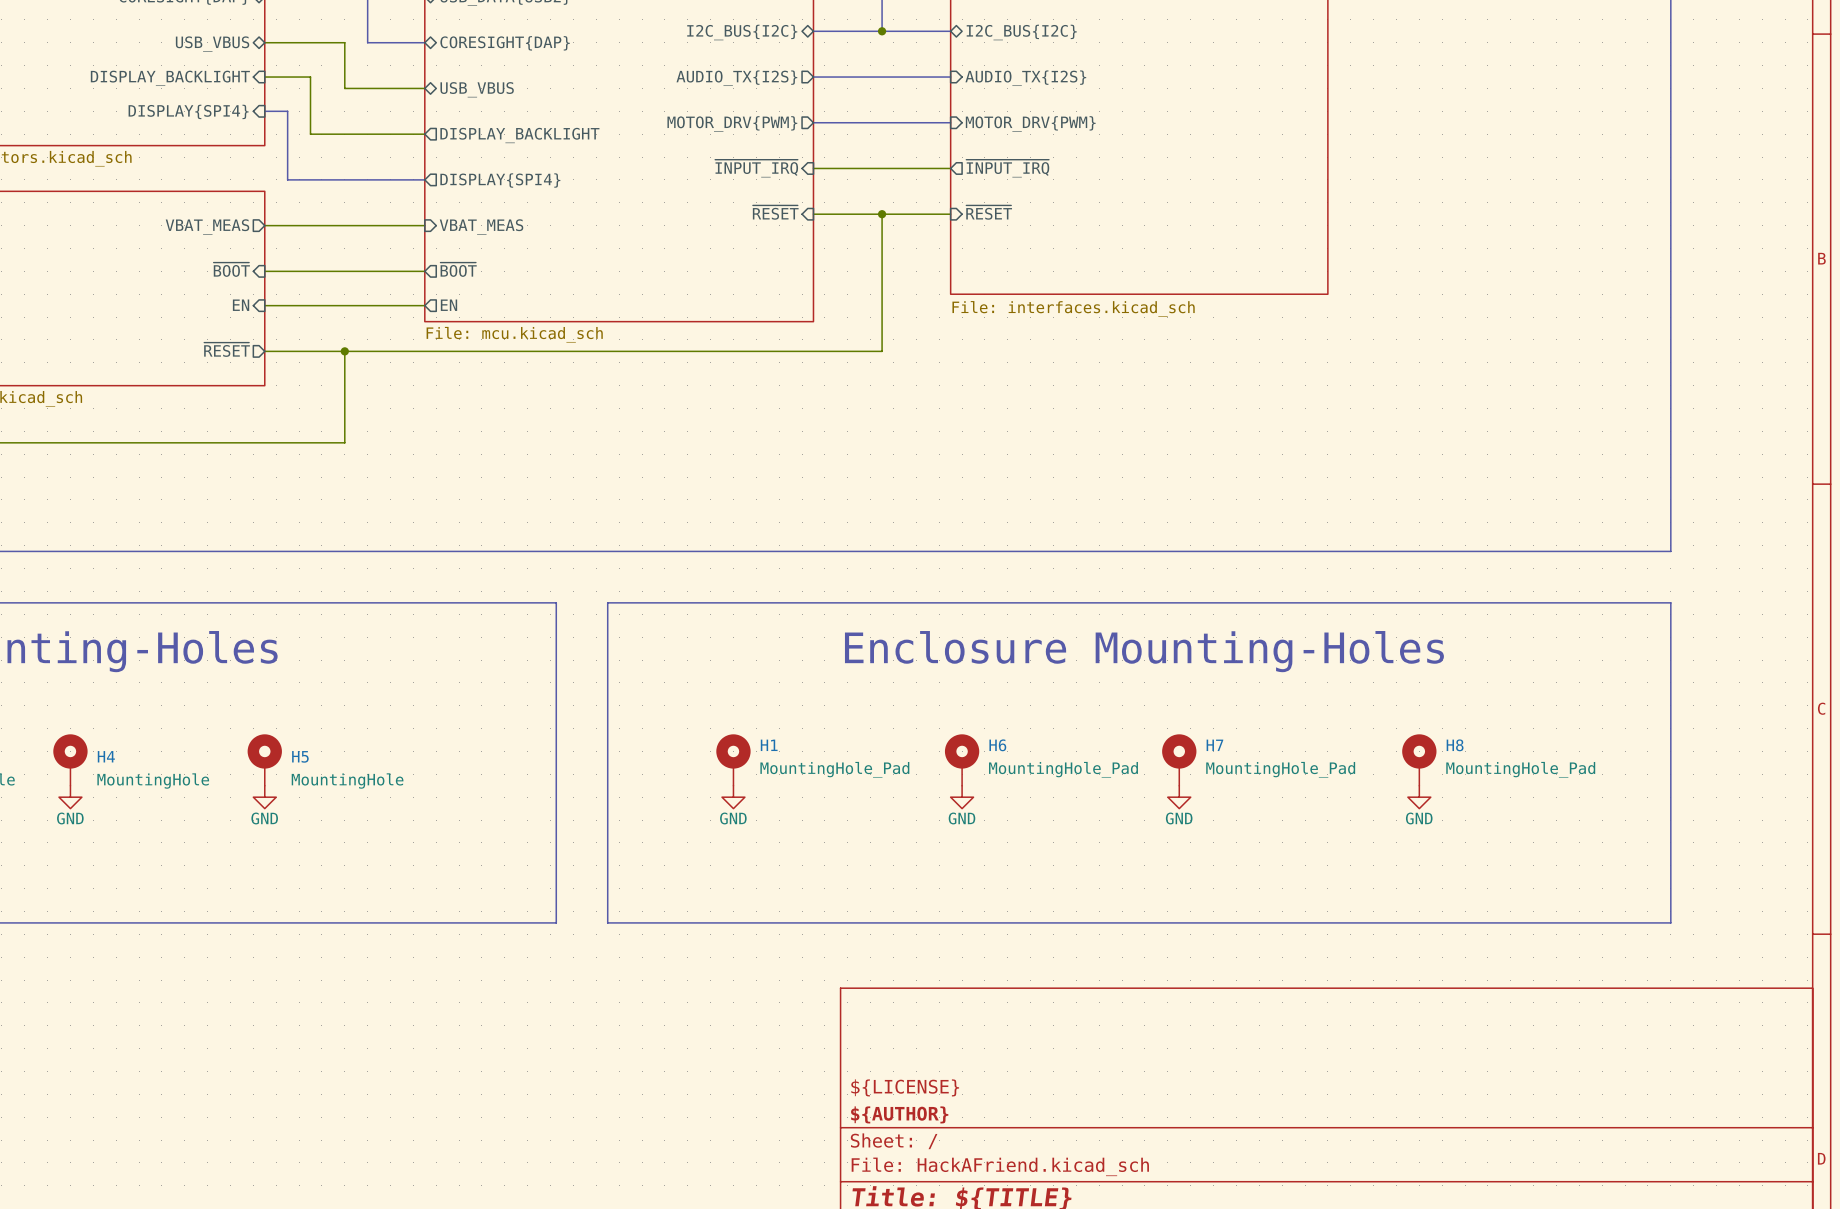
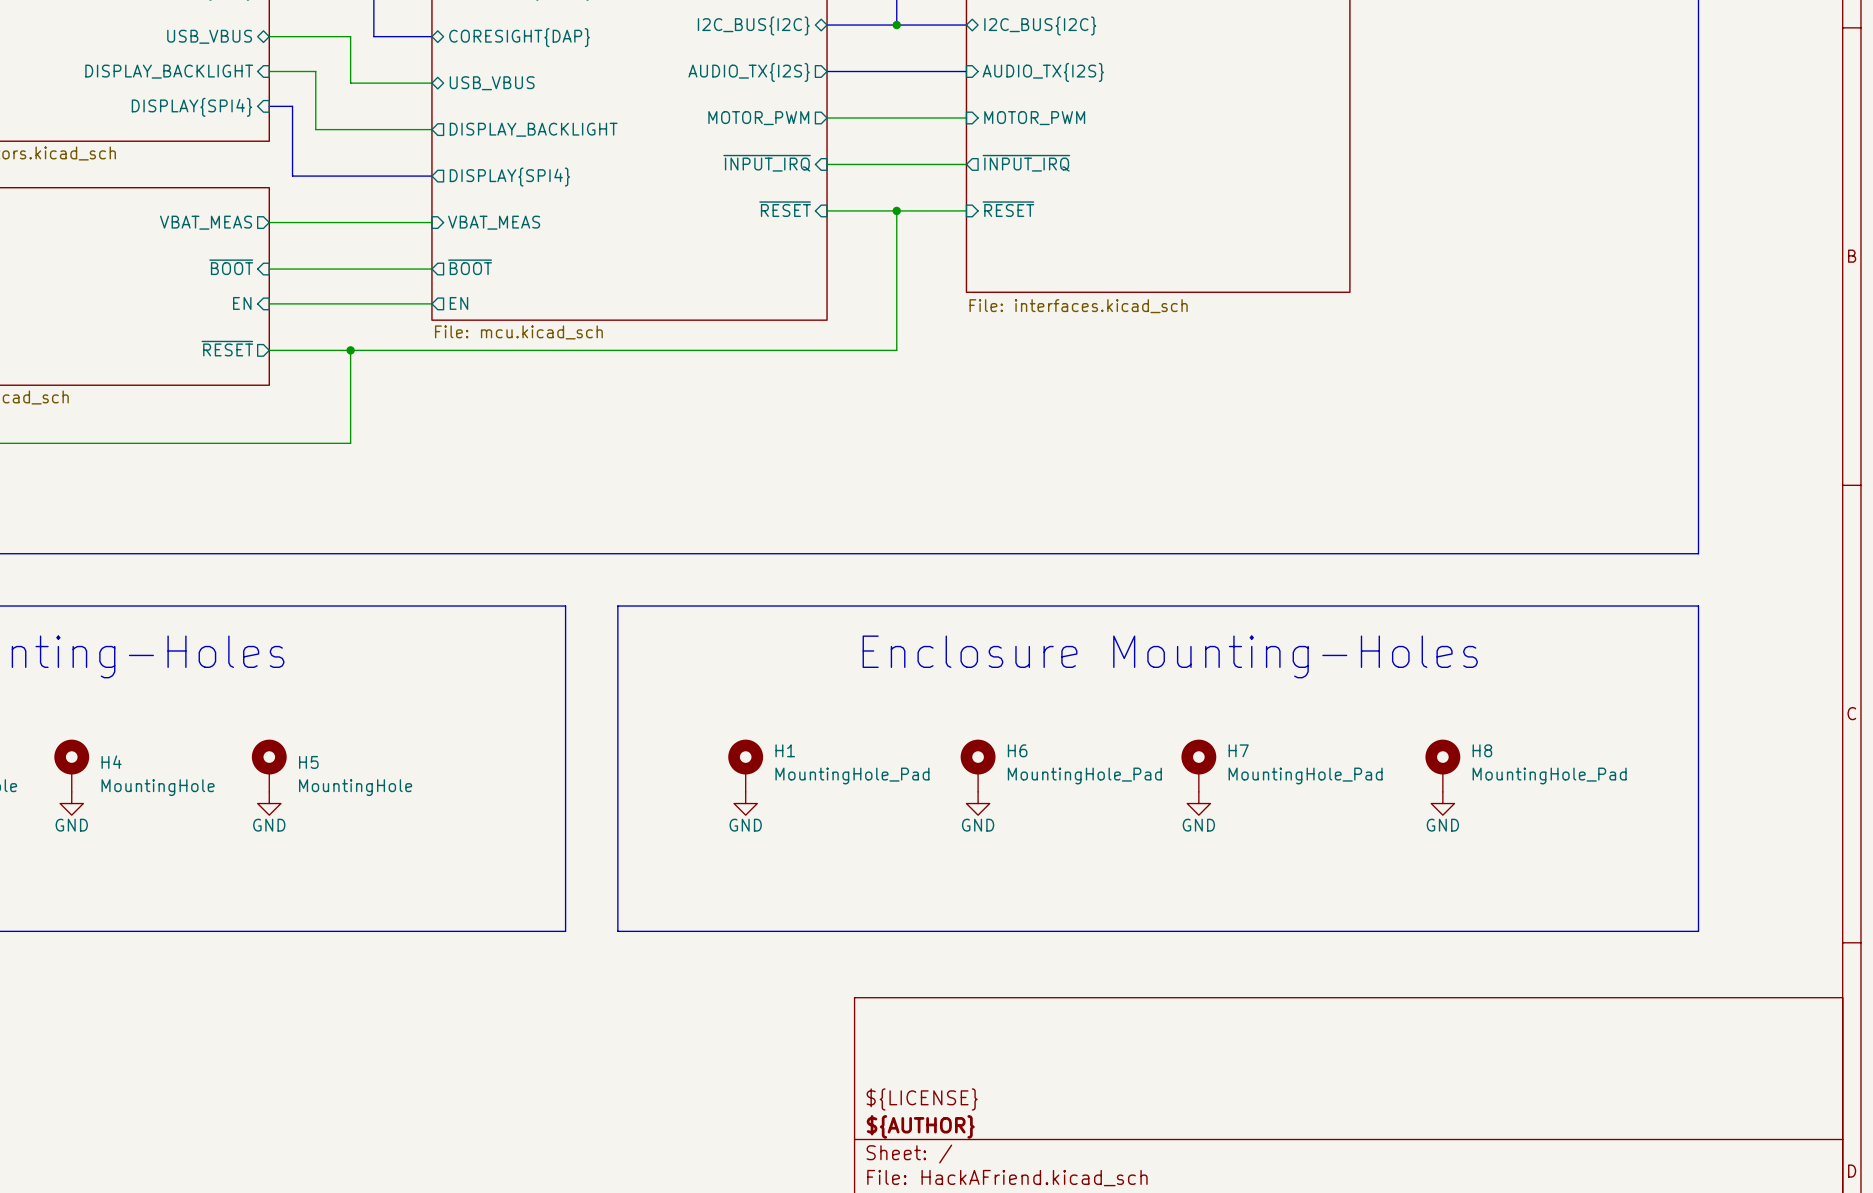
bus: (813, 122) (950, 122) -> none
sheet pin: MOTOR_DRV{PWM} (732, 123) -> MOTOR_PWM (758, 118)
sheet pin: MOTOR_DRV{PWM} (1030, 123) -> MOTOR_PWM (1034, 118)

